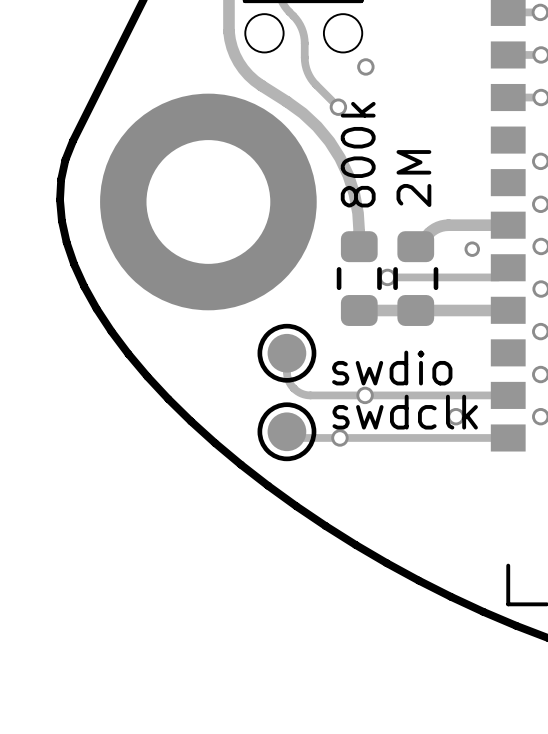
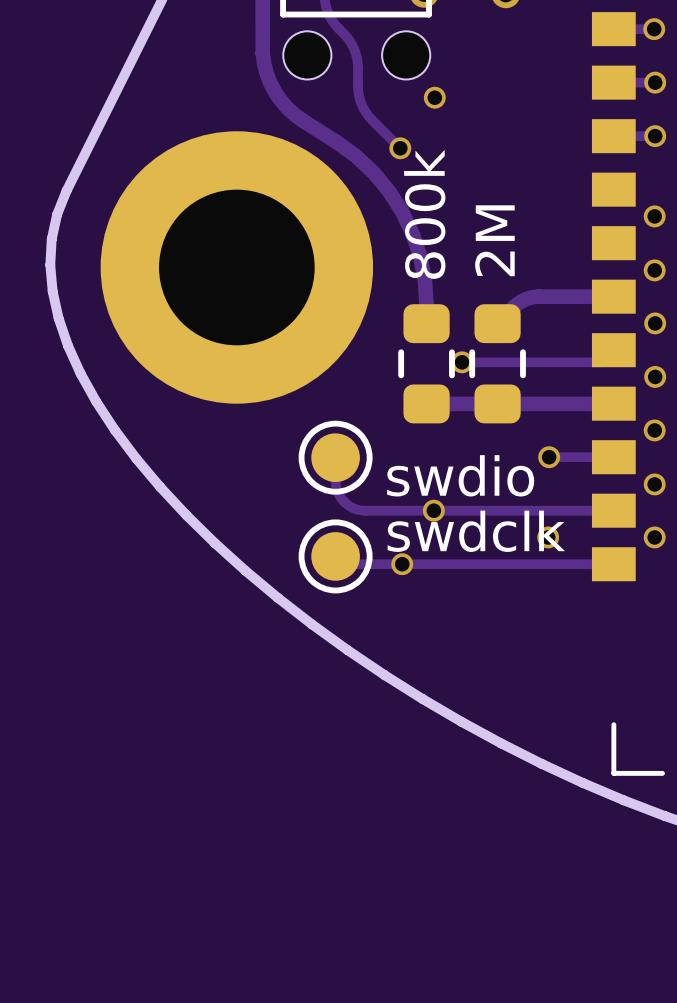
via: (472, 249) -> none
via: none -> (549, 457)
track: none -> (613, 457) (549, 457)

